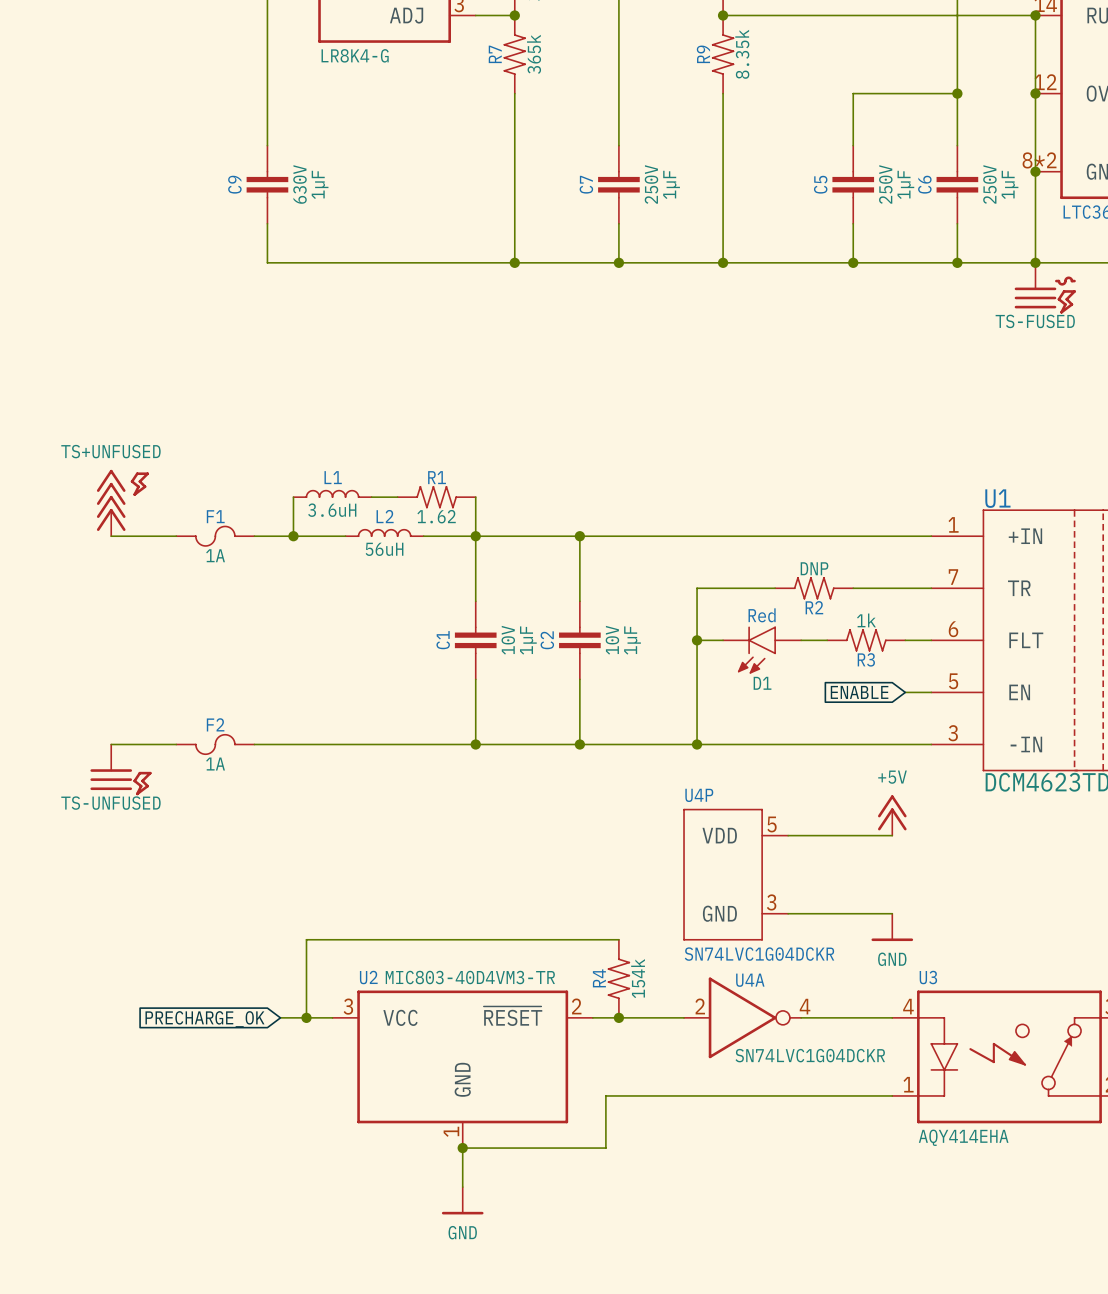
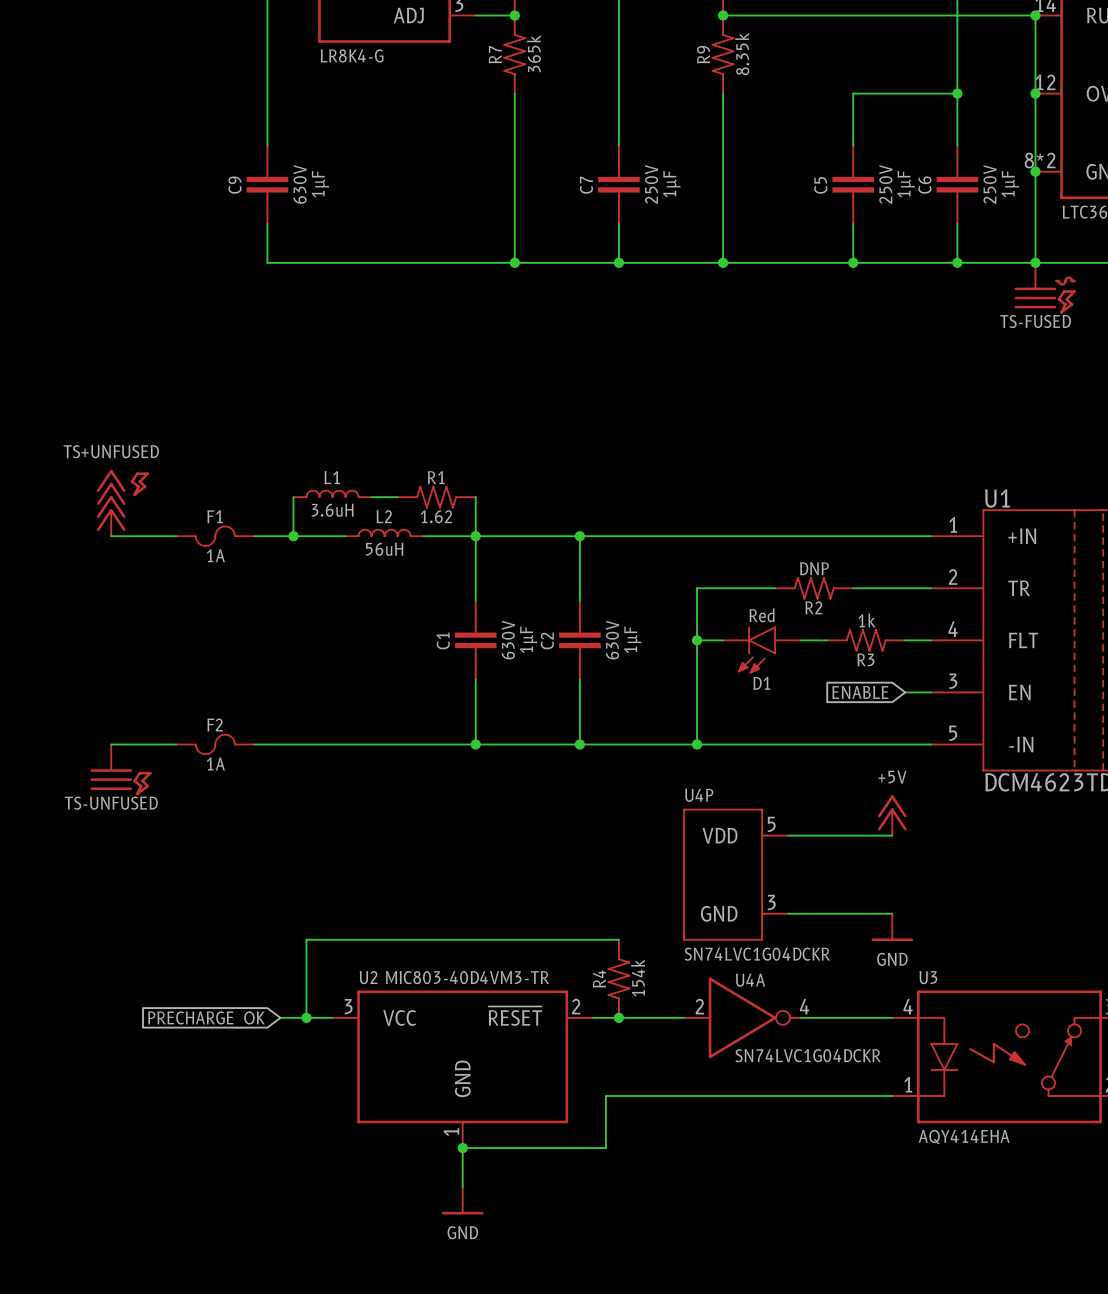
U1 pin number: 7 (953, 577) -> 2 (953, 577)
U1 pin number: 6 (953, 629) -> 4 (953, 629)
C1 text: 10V (508, 640) -> 630V (508, 640)
C2 text: 10V (612, 640) -> 630V (612, 640)
U1 pin number: 5 (953, 681) -> 3 (953, 681)
U1 pin number: 3 (953, 733) -> 5 (953, 733)

